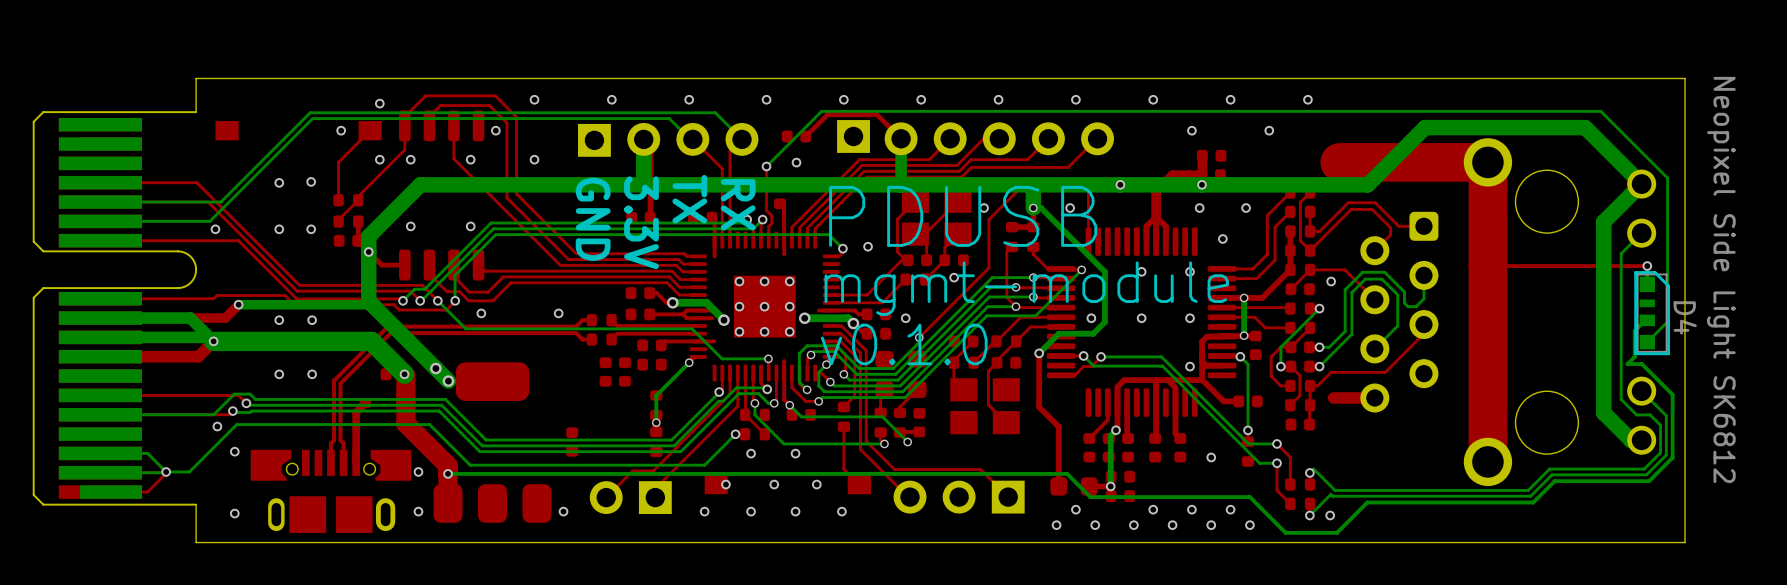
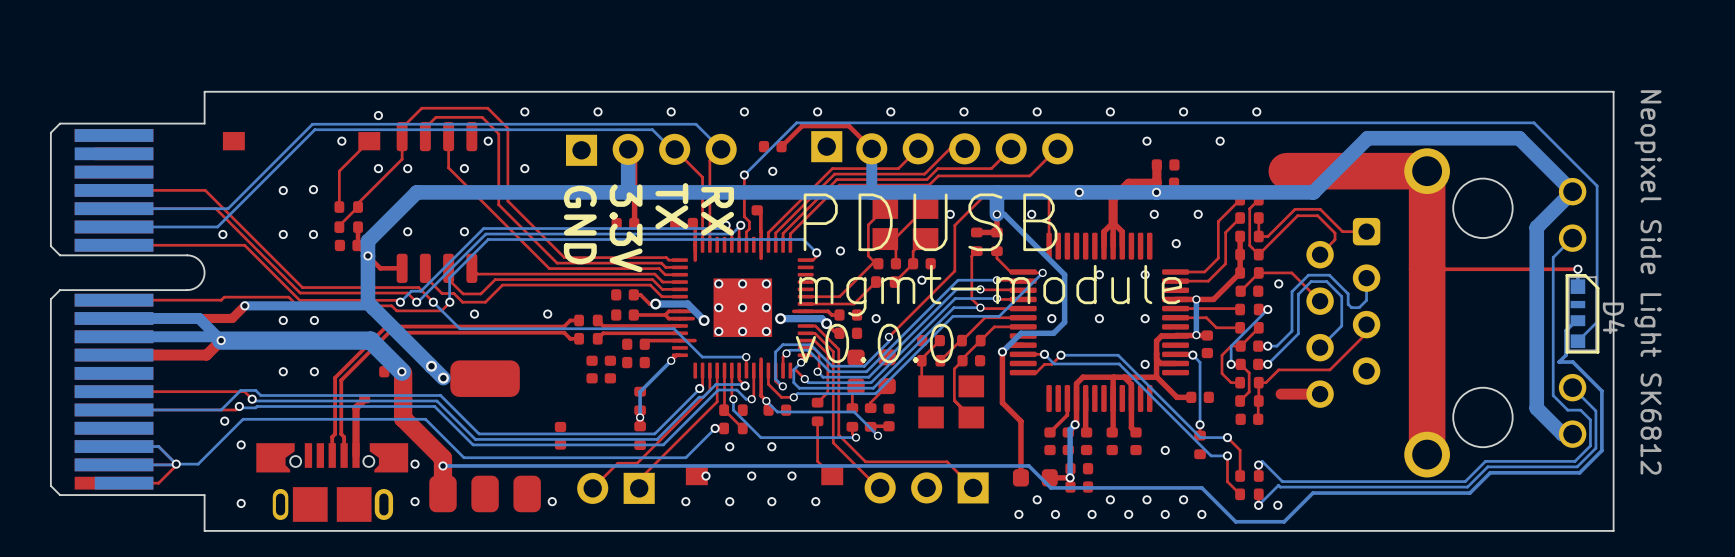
text: v0.1.0 (904, 344) -> v0.0.0 (874, 343)

